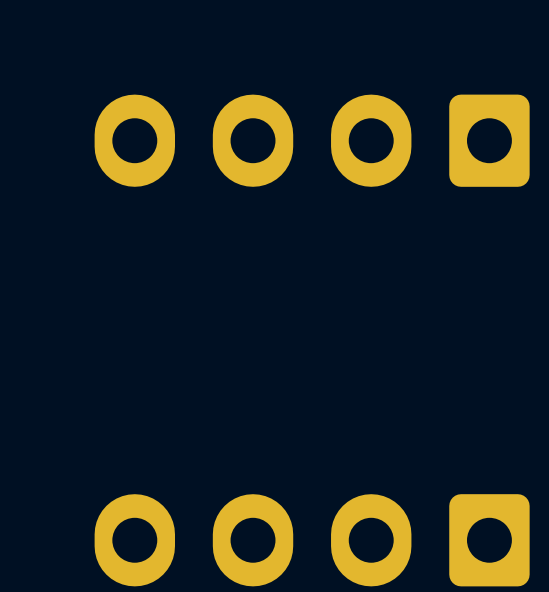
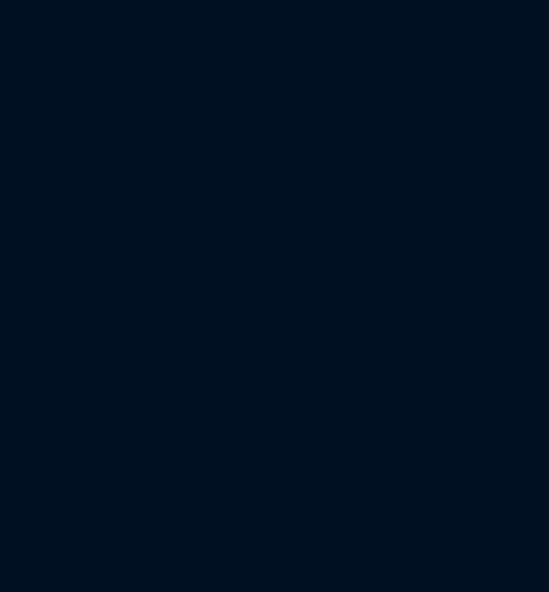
part: (312, 140) -> none
part: (312, 540) -> none

